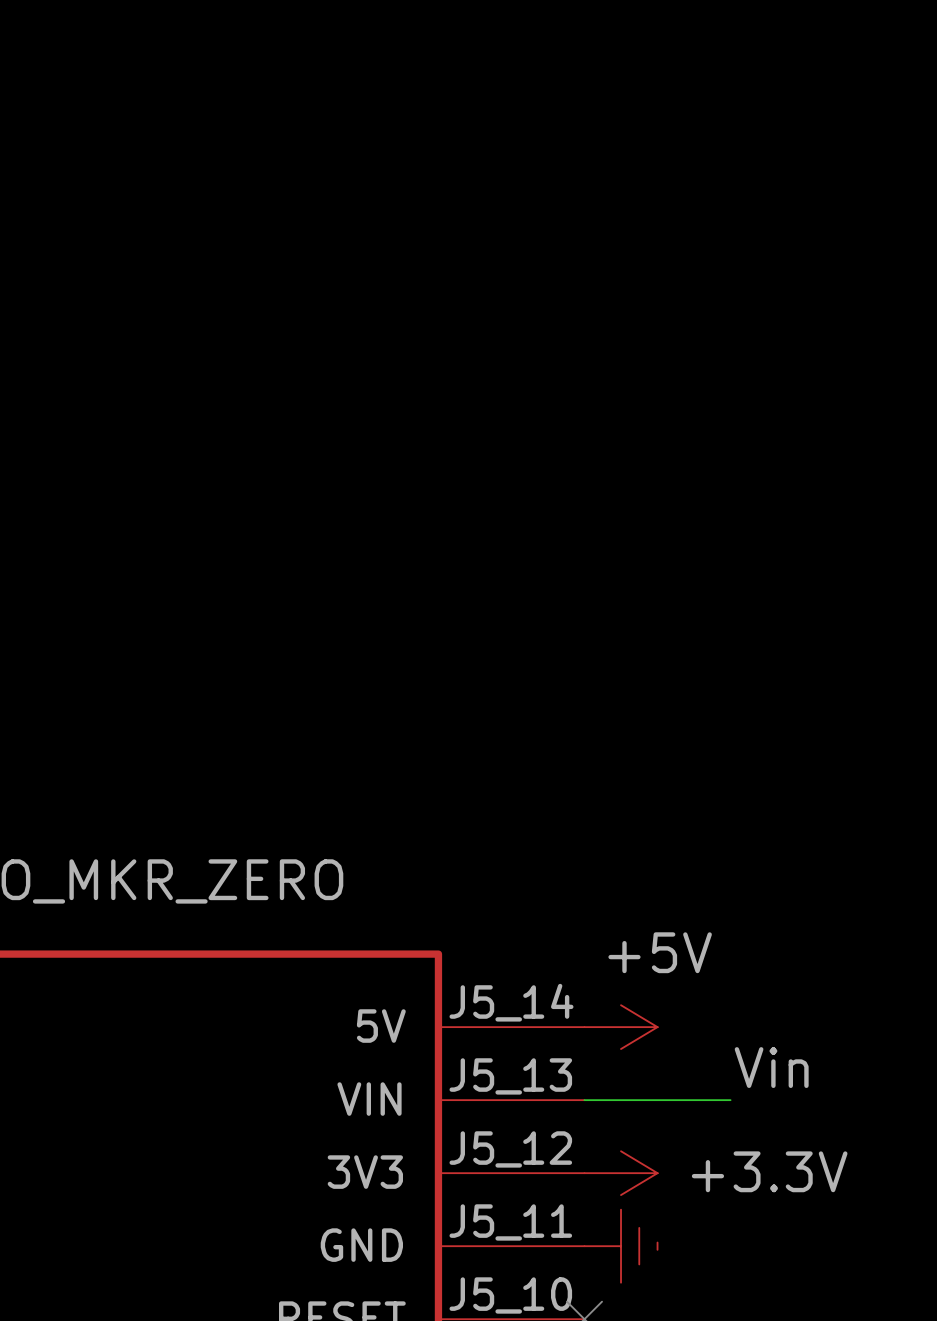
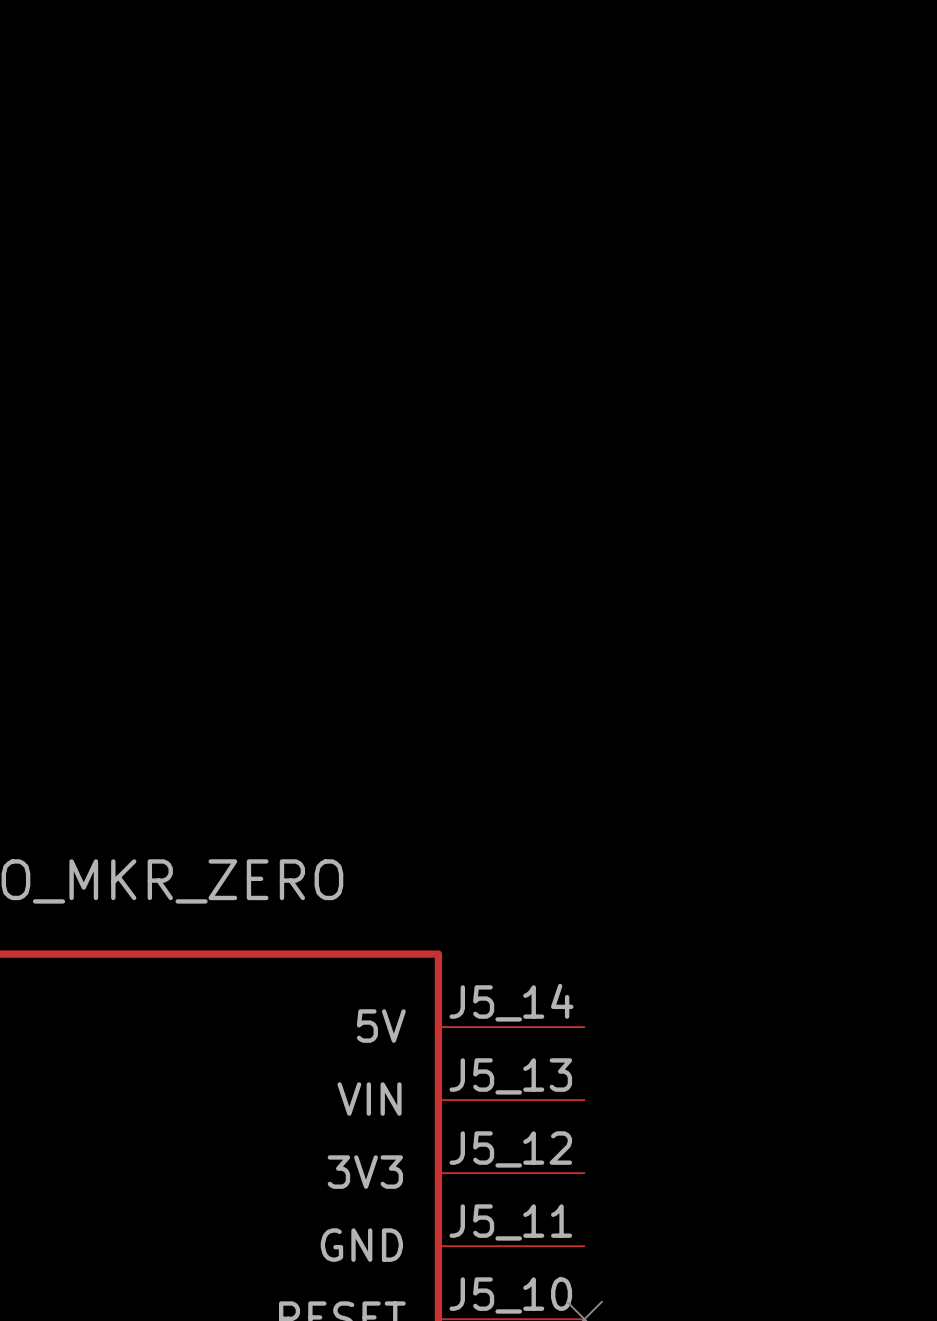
power symbol: +5V (621, 1027) -> none
label: Vin (771, 1067) -> none
wire: (584, 1100) (730, 1100) -> none
power symbol: +3.3V (621, 1173) -> none
power symbol: (621, 1246) -> none

